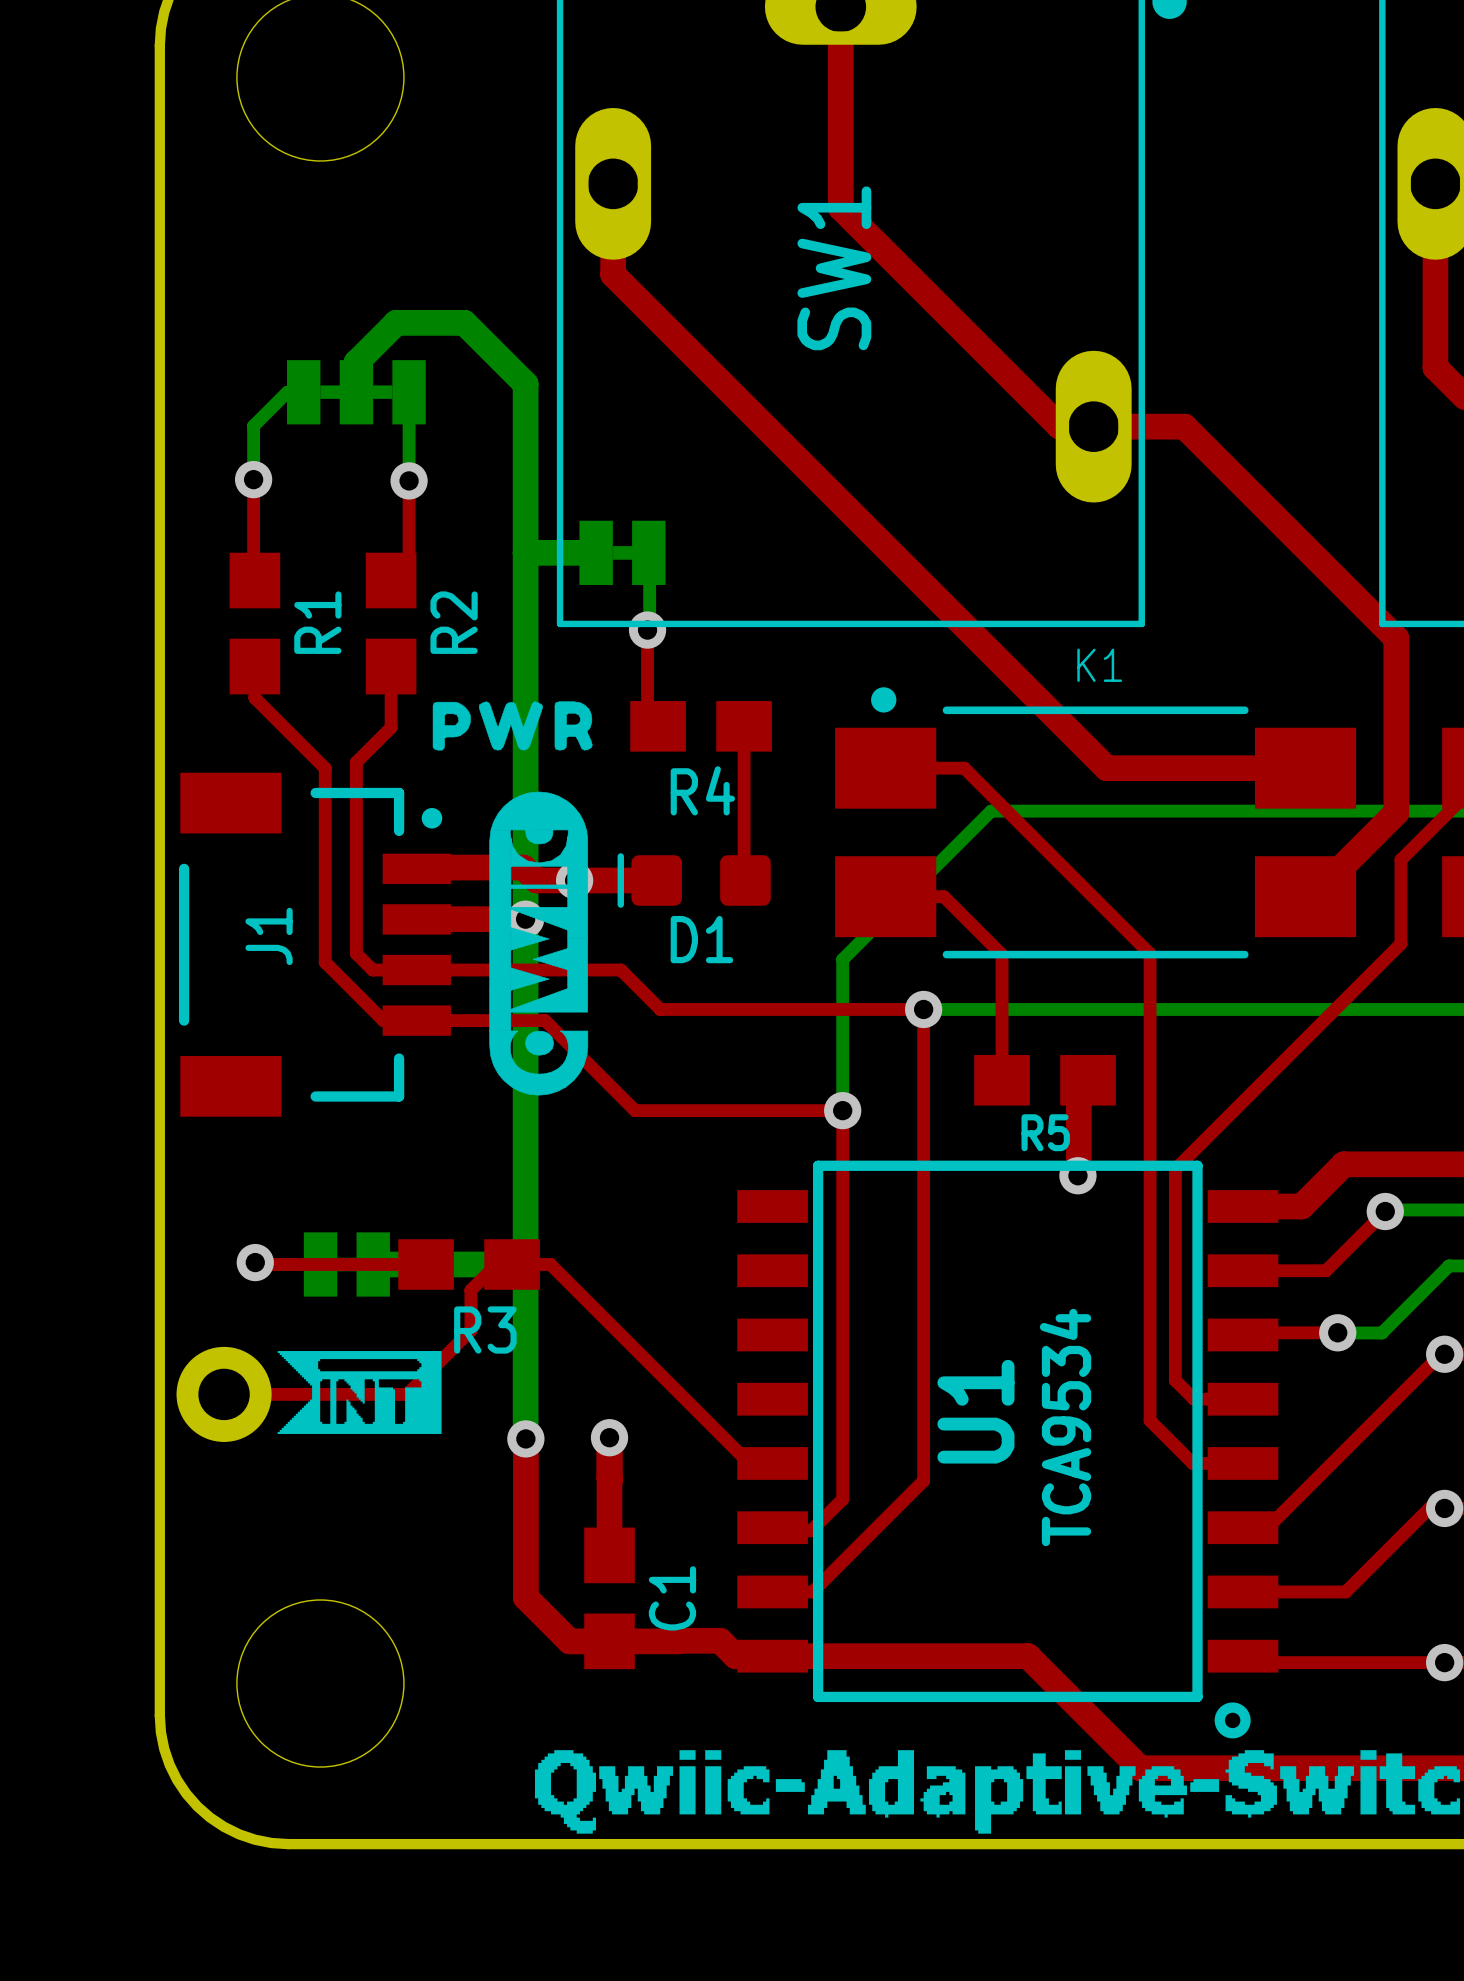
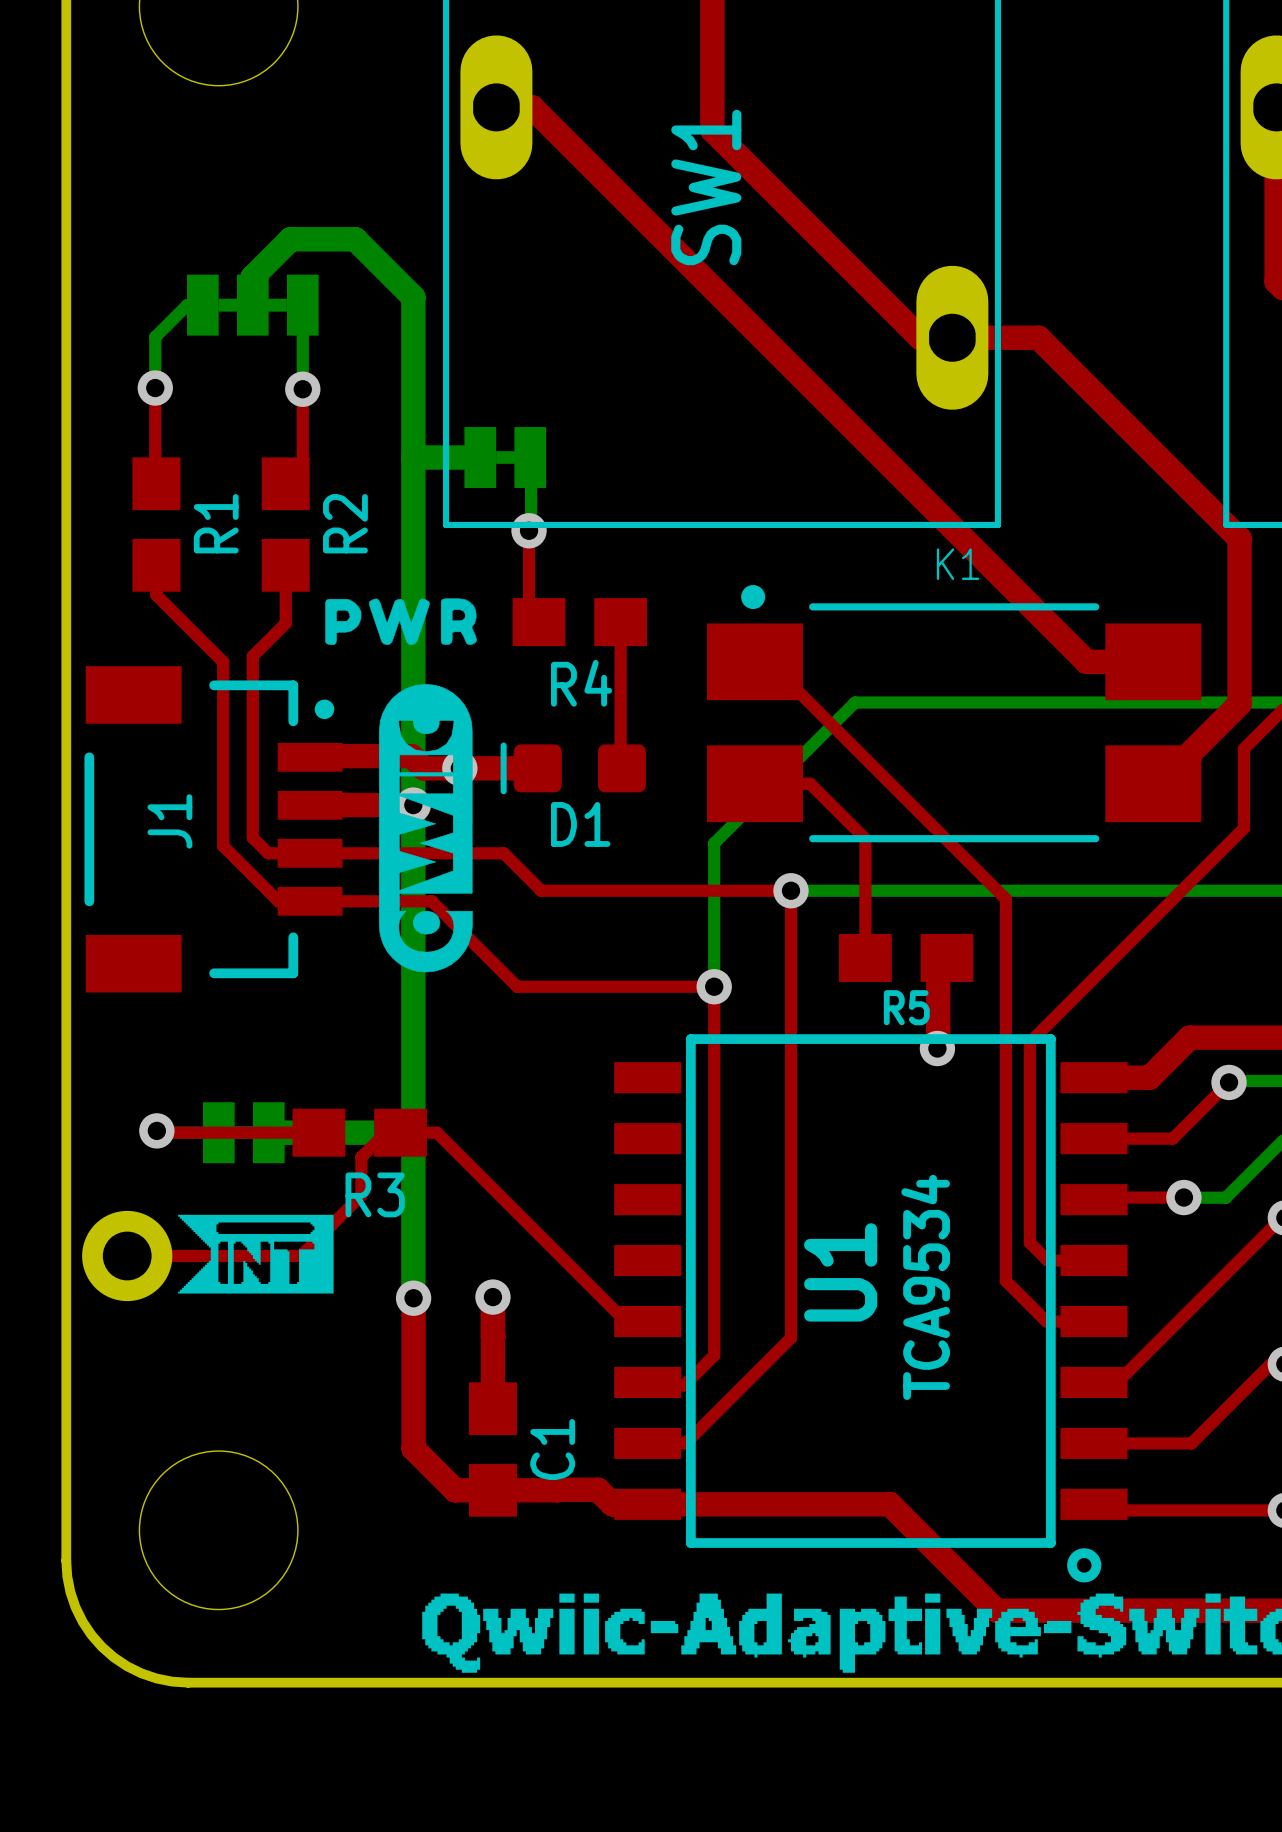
top track: (613, 183) (613, 274) (1106, 768) (1235, 768) -> (496, 107) (532, 107) (1086, 661)
top track: (900, 768) (964, 768) (1150, 953) (1150, 1018) -> (768, 661) (1005, 899)

